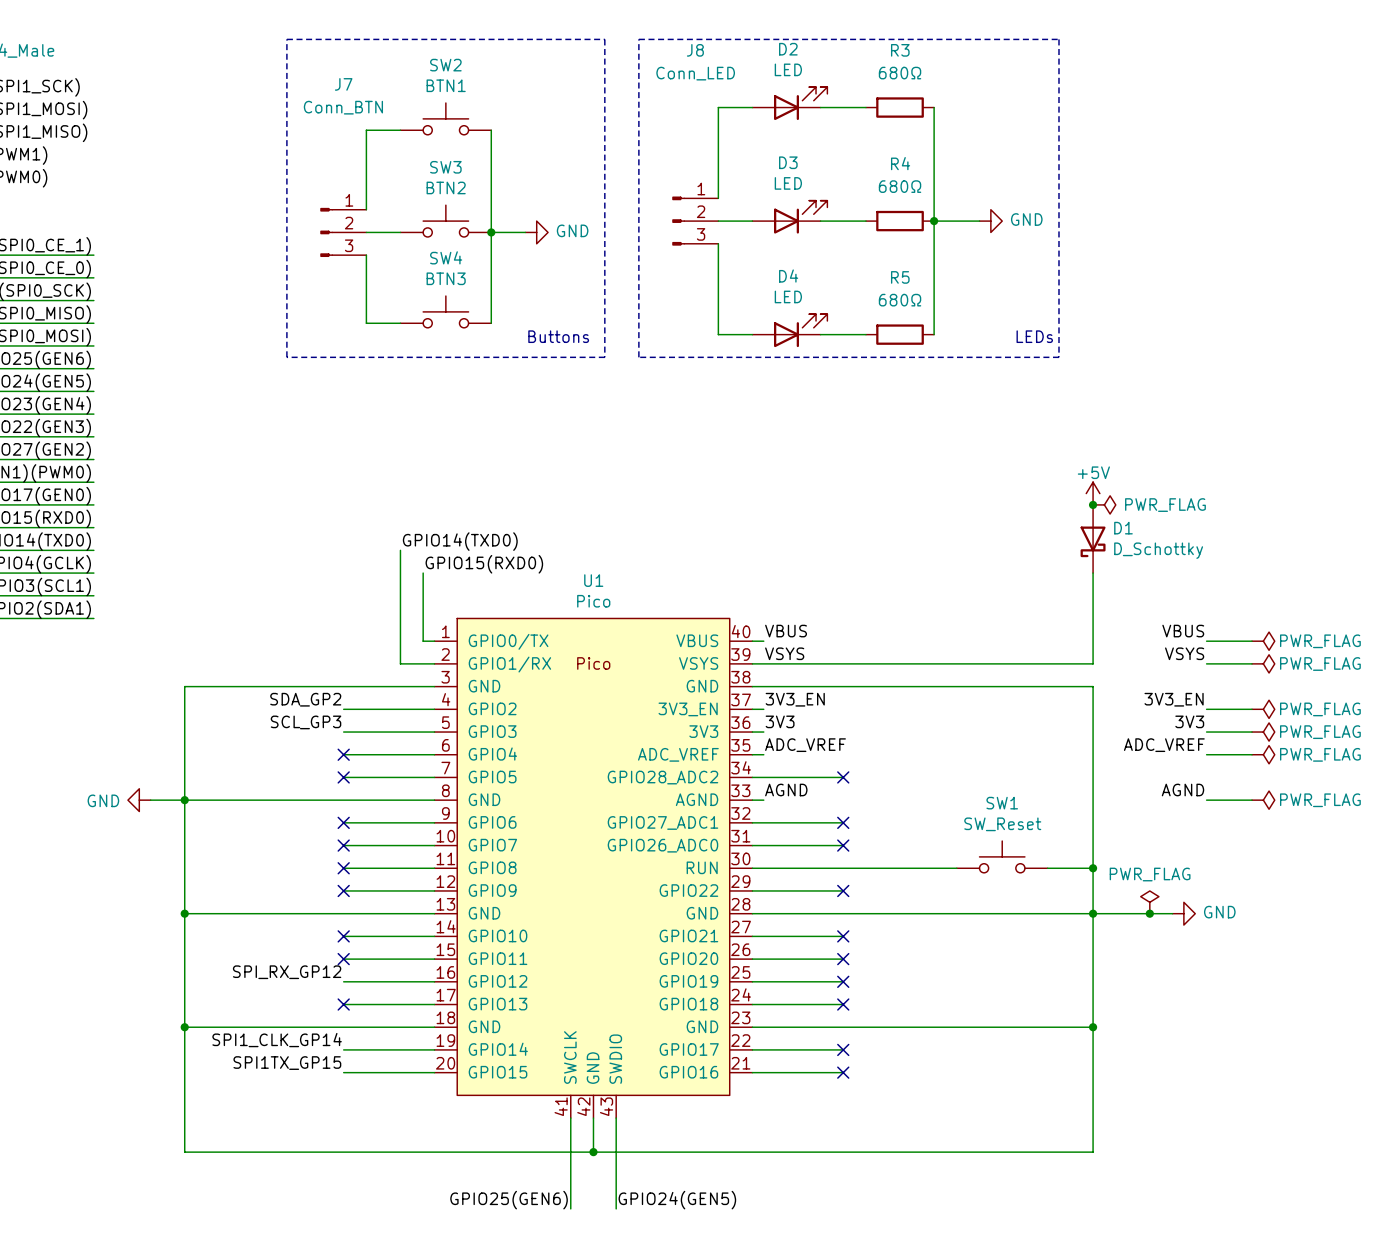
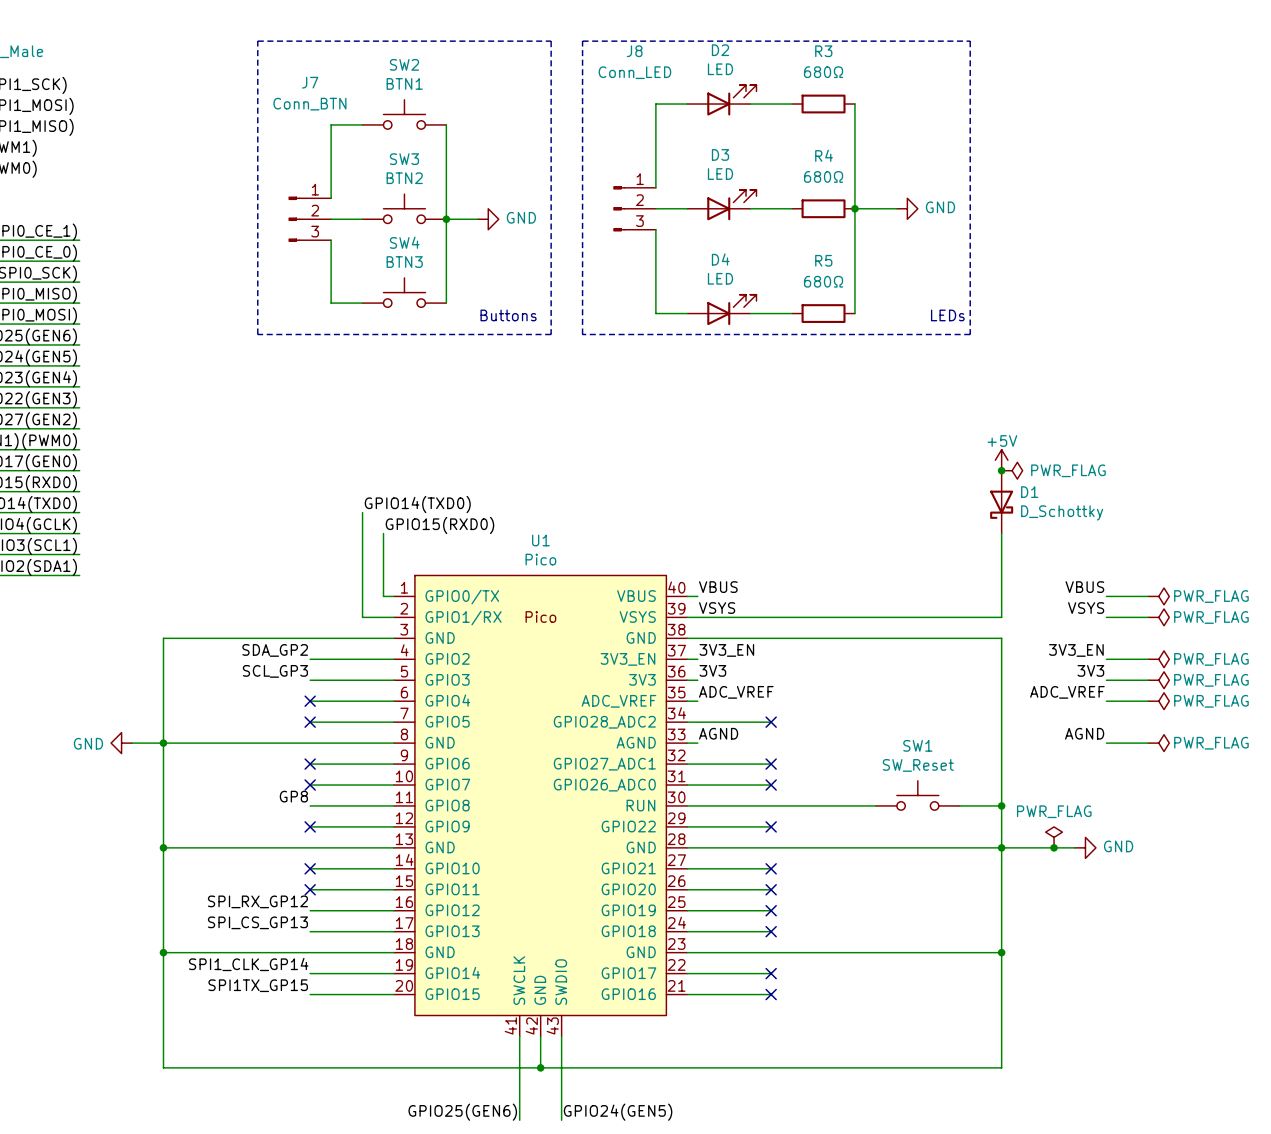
label: none -> GP8 (293, 796)
no-connect mark: (343, 868) -> none
label: none -> SPI_CS_GP13 (257, 922)
no-connect mark: (343, 1004) -> none

